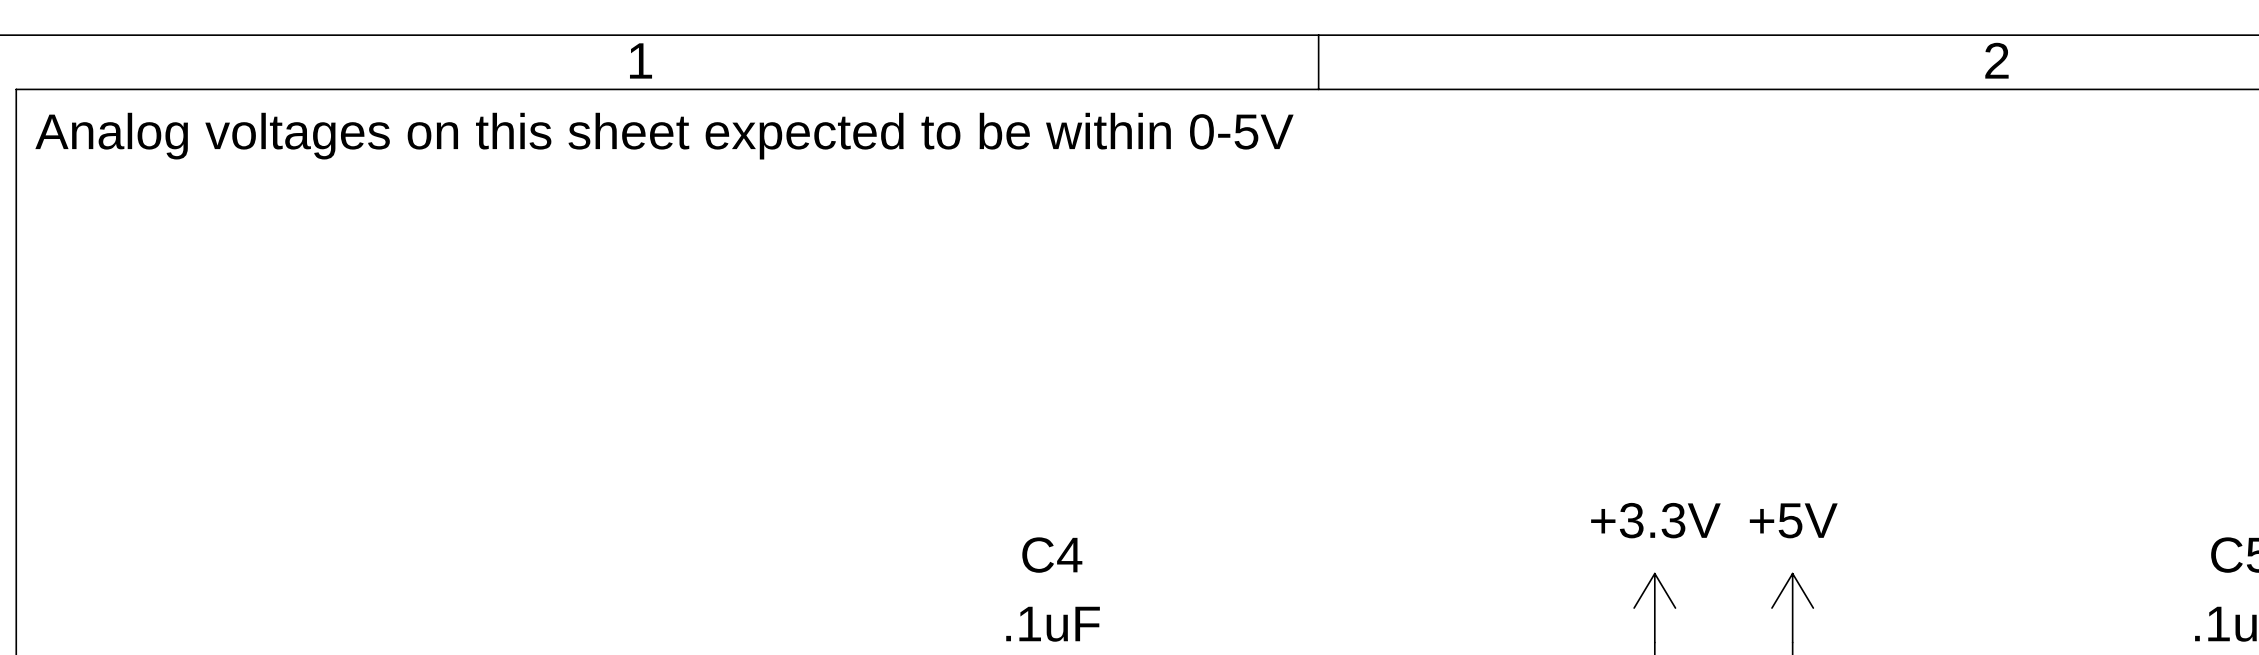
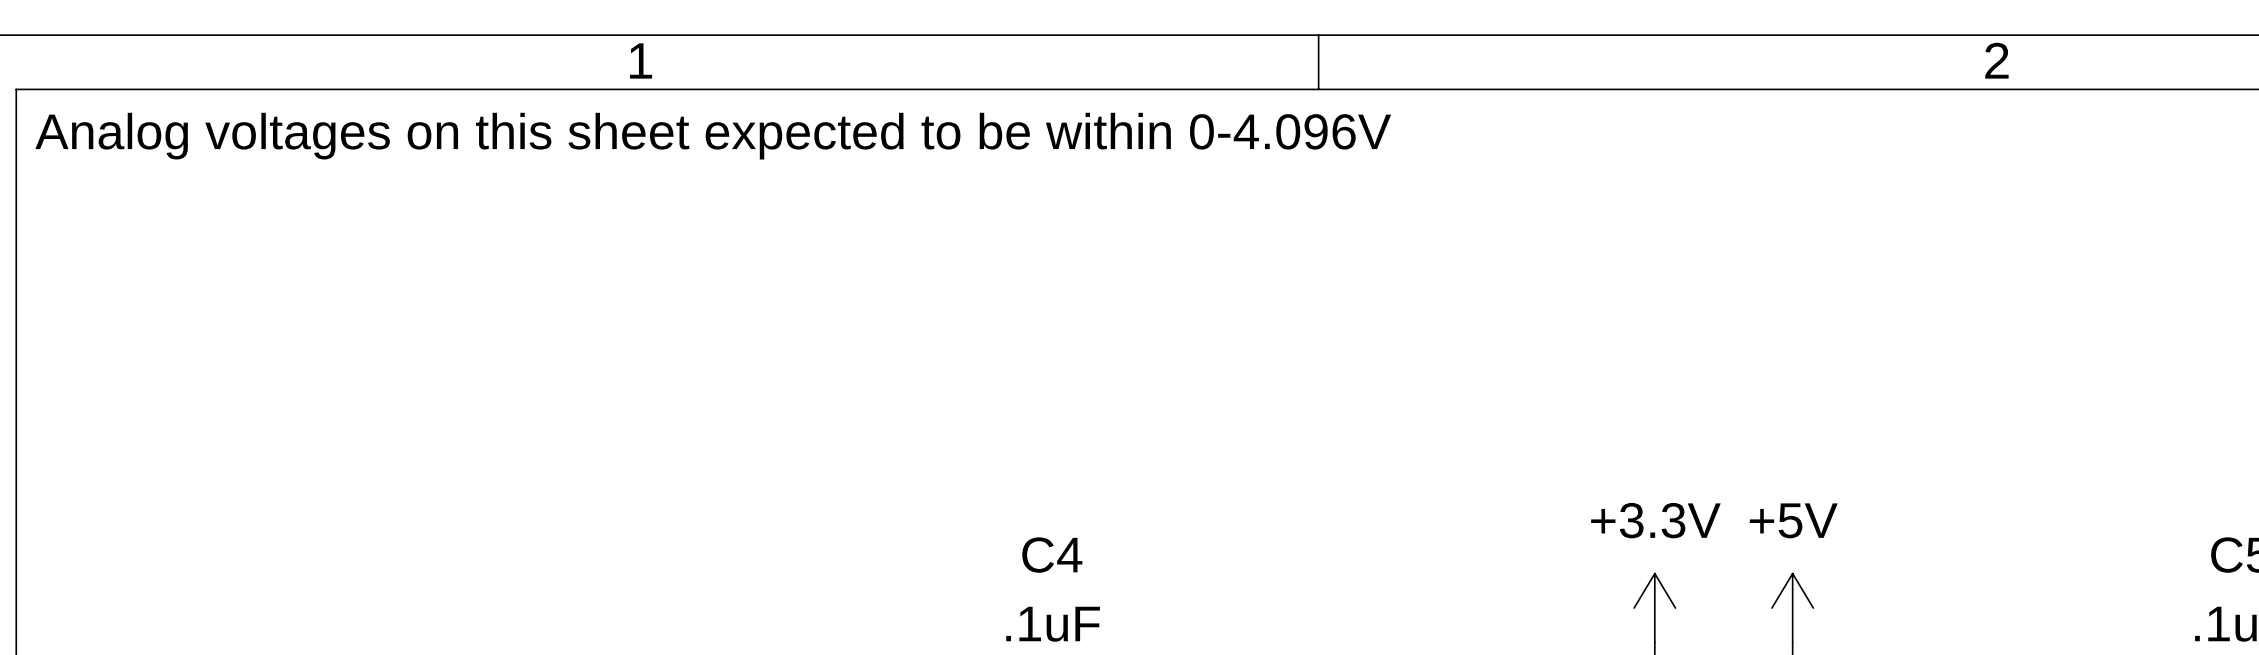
text: Analog voltages on this sheet expected to be within 0-5V (664, 136) -> Analog voltages on this sheet expected to be within 0-4.096V (713, 136)

